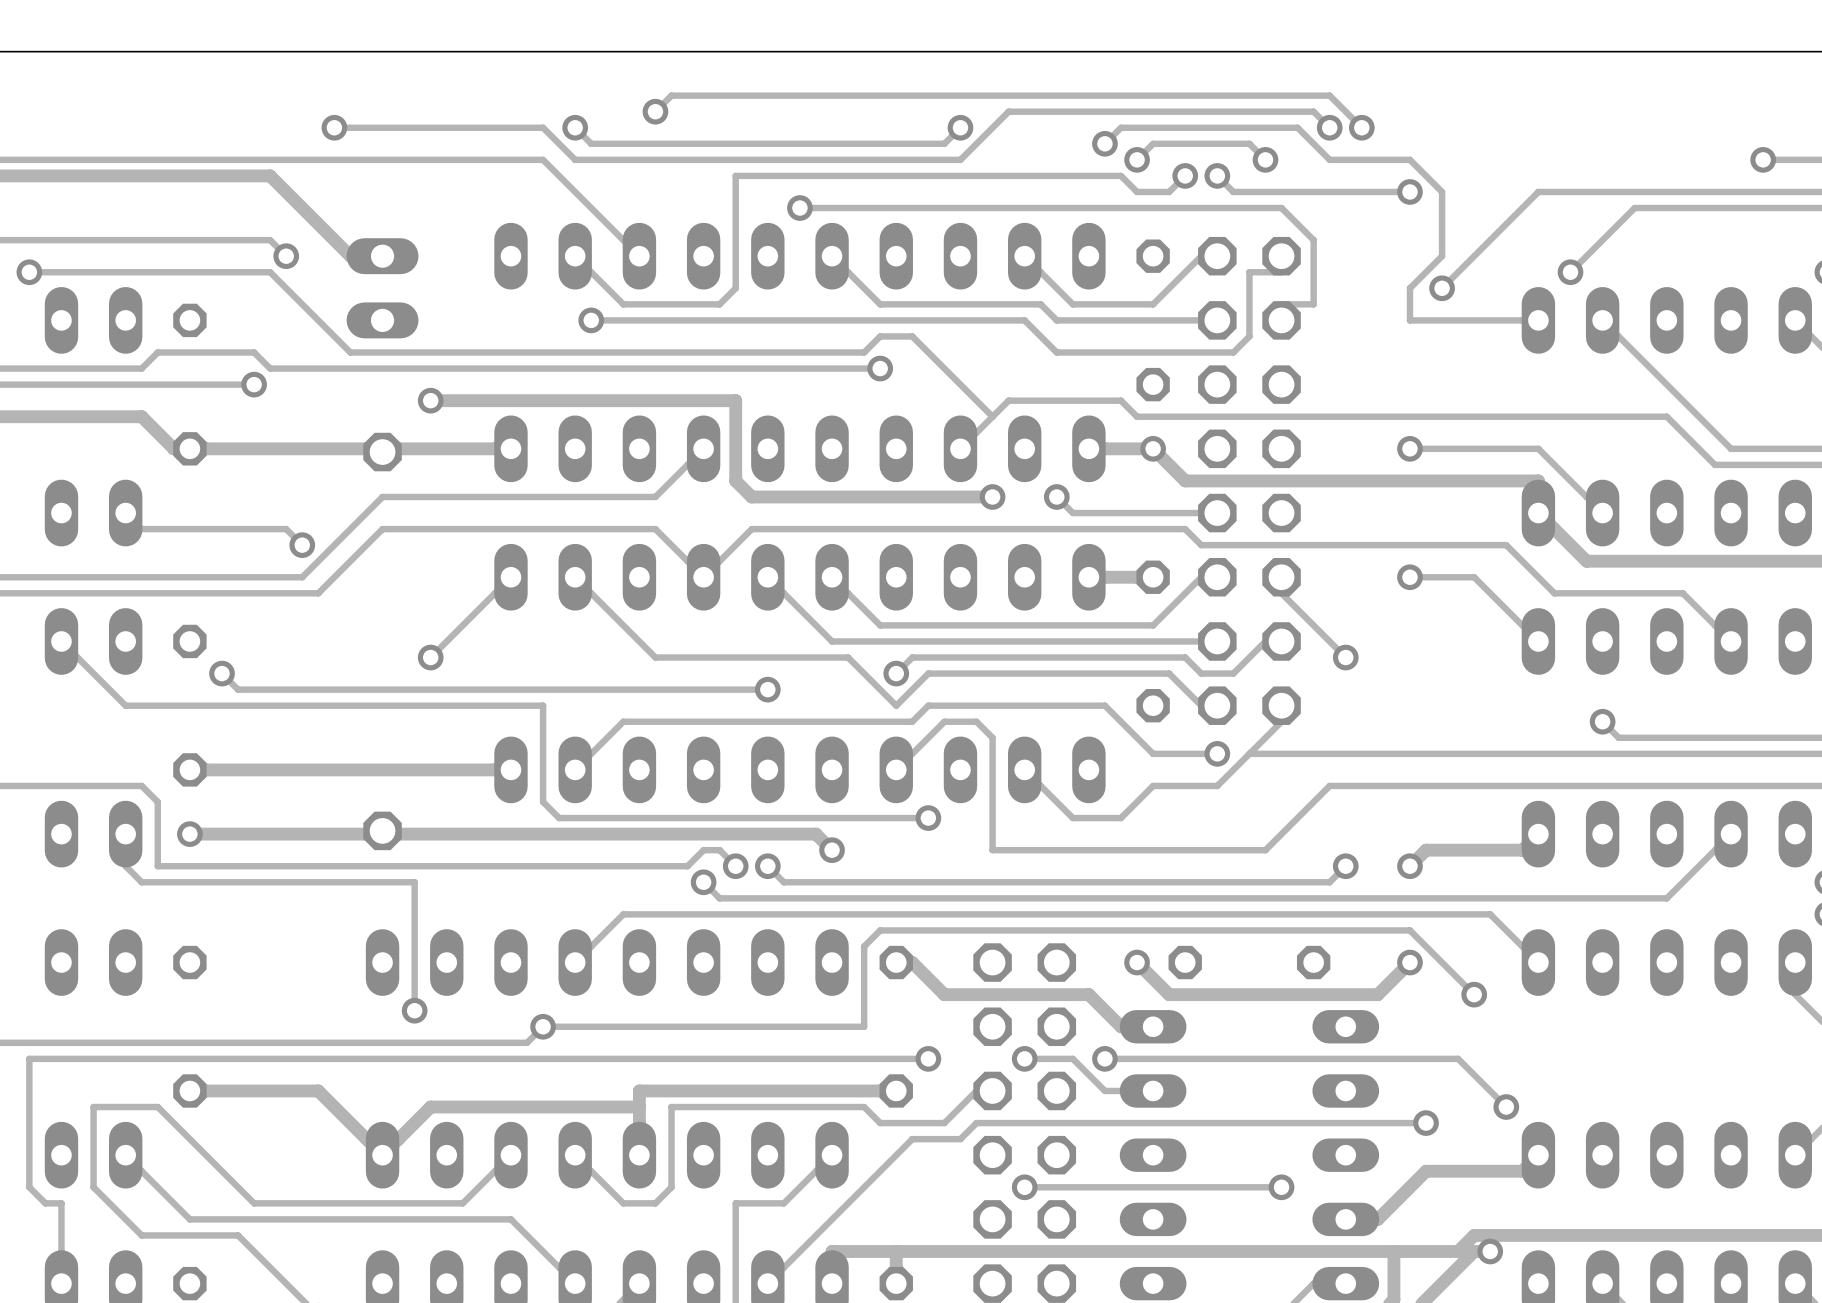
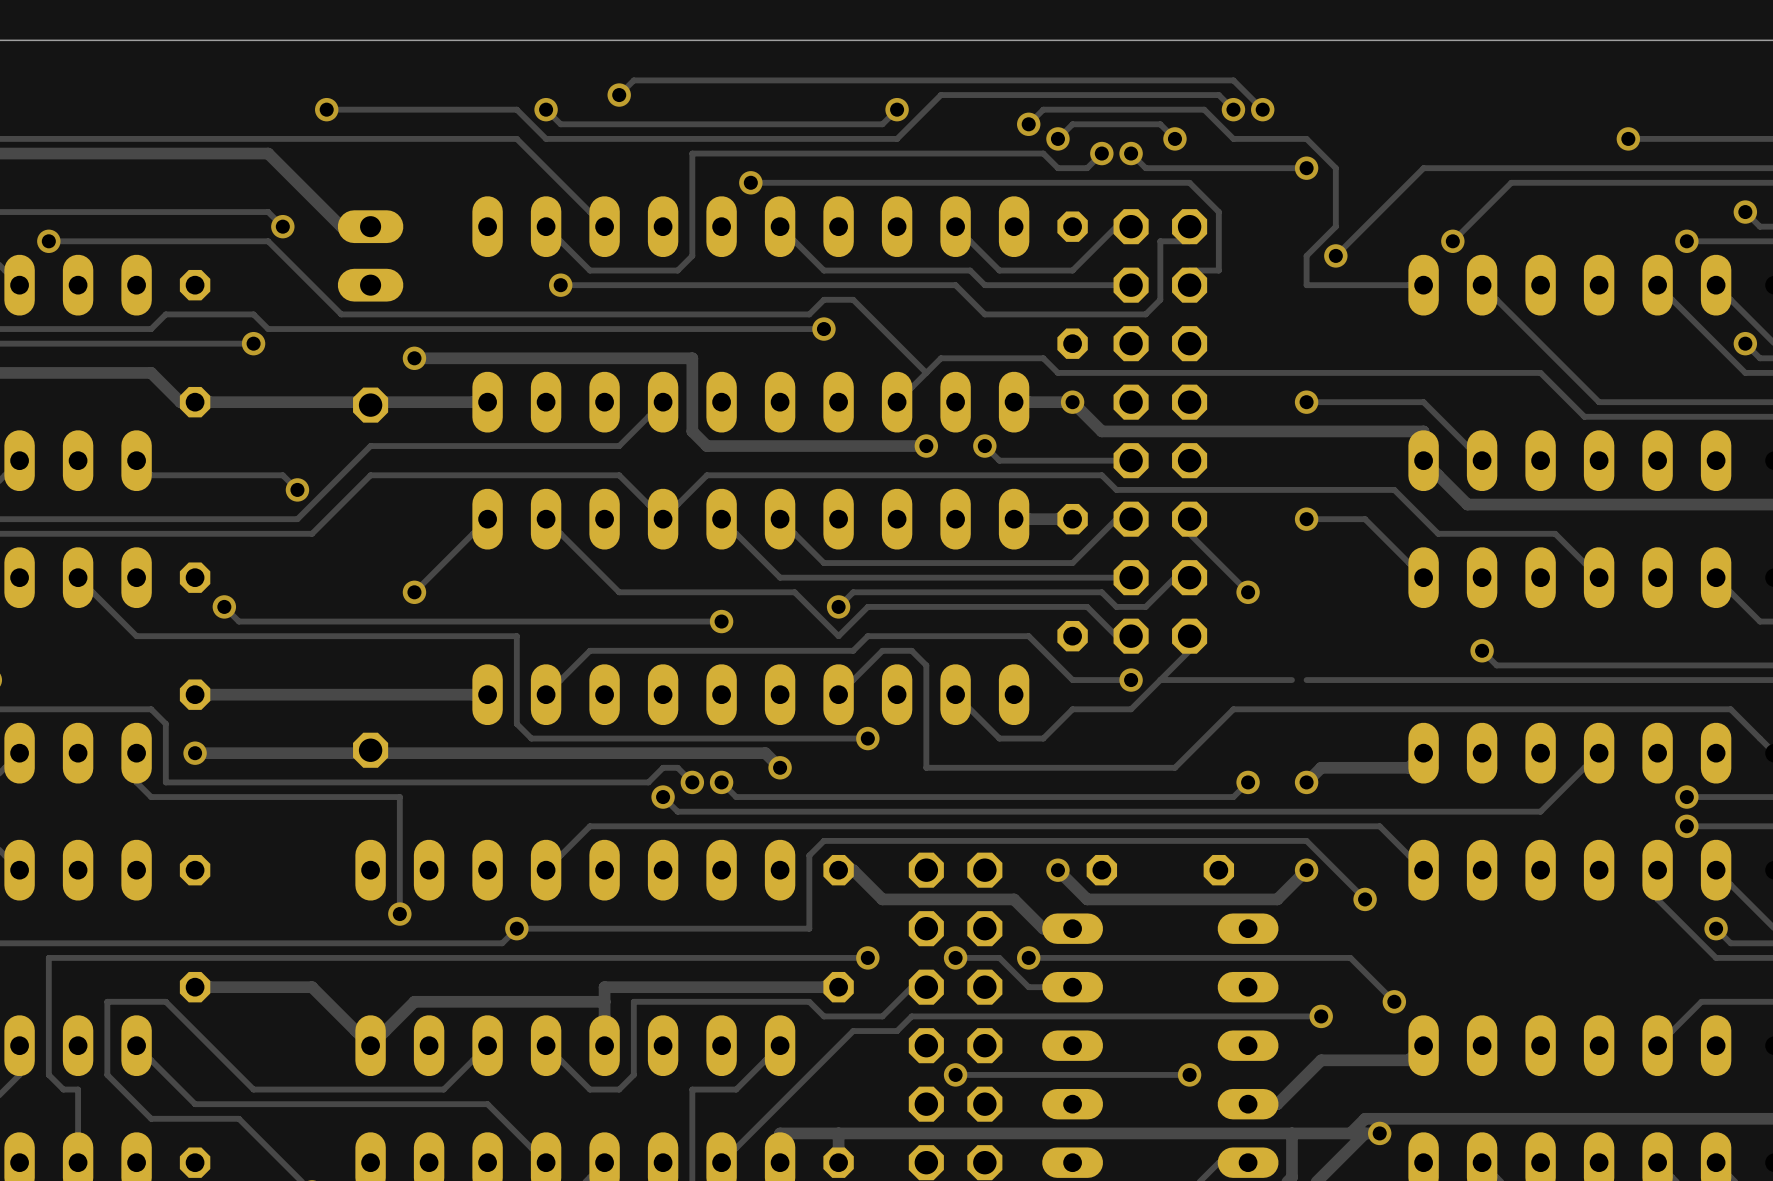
track: (1409, 753) (1393, 753) -> none

